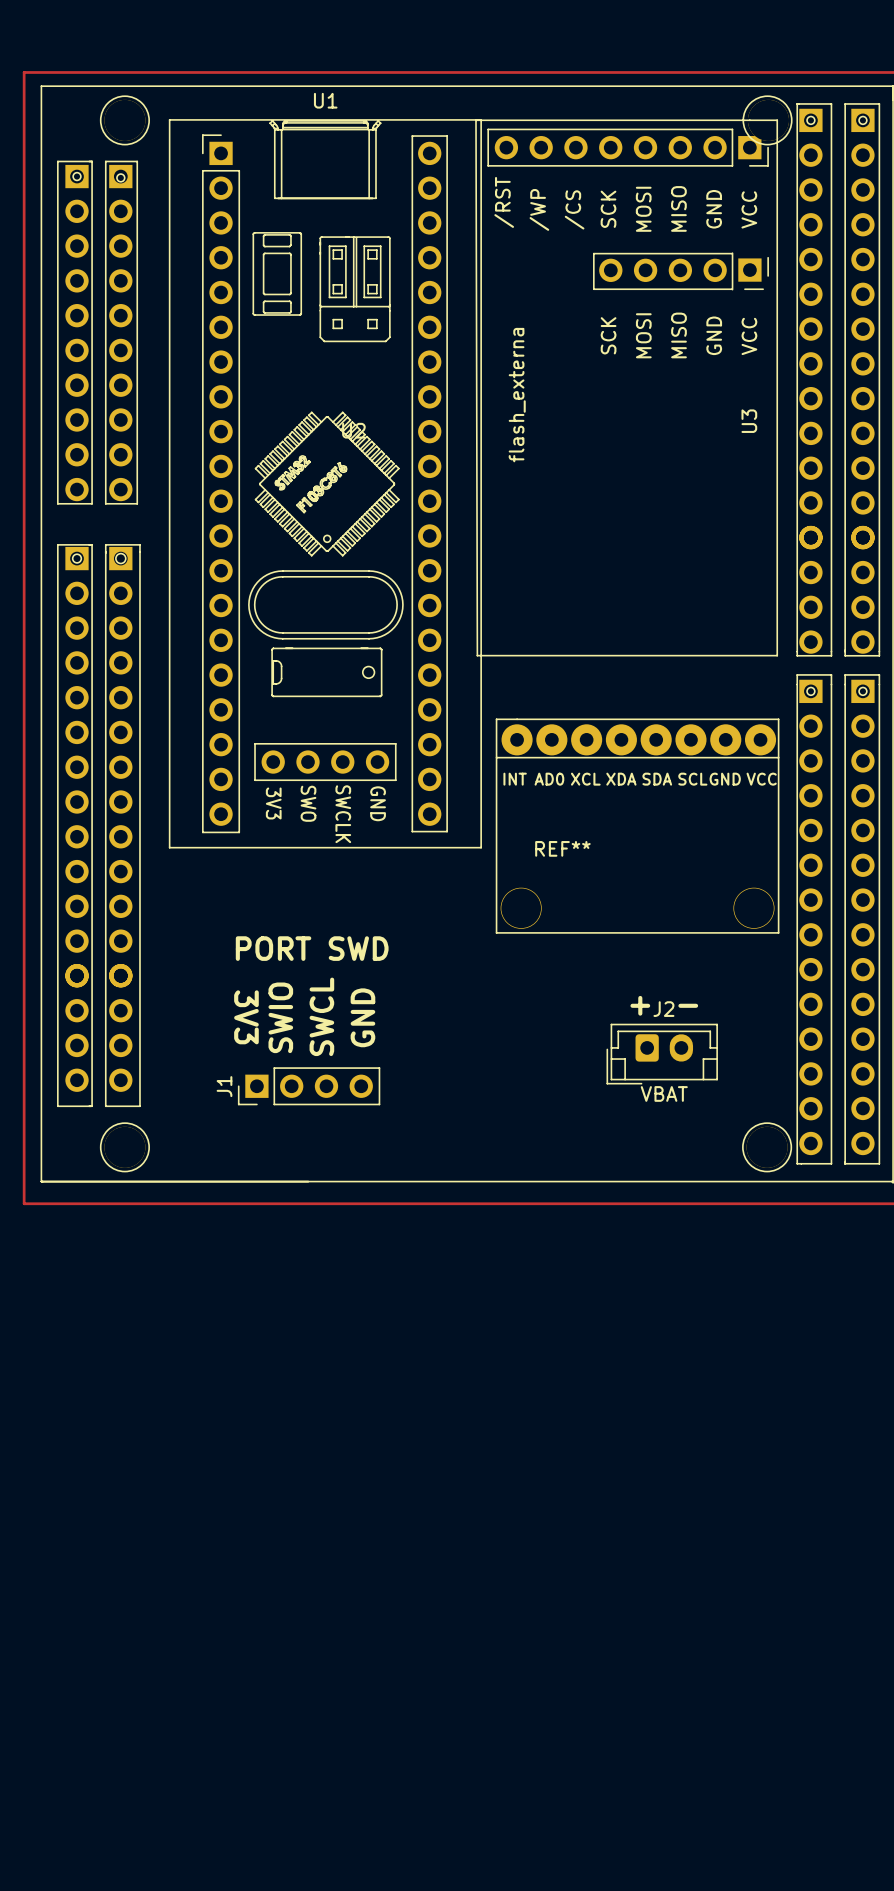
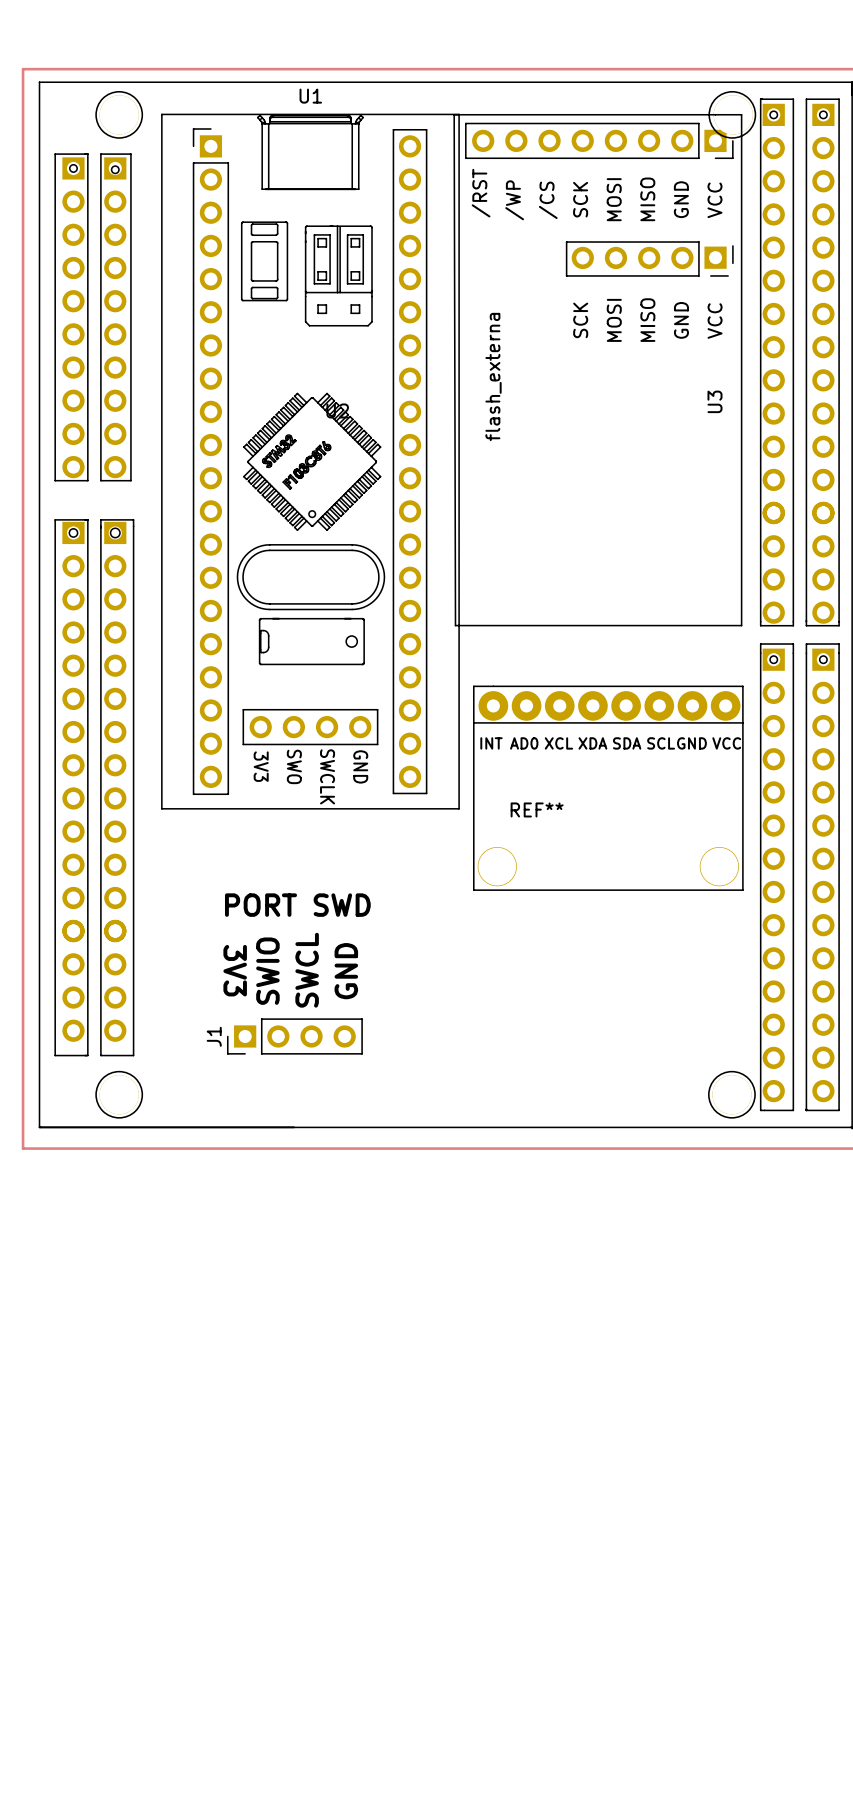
text: + (640, 1005) -> none
text: - (688, 1005) -> none
J2: VBAT (662, 1054) -> none

